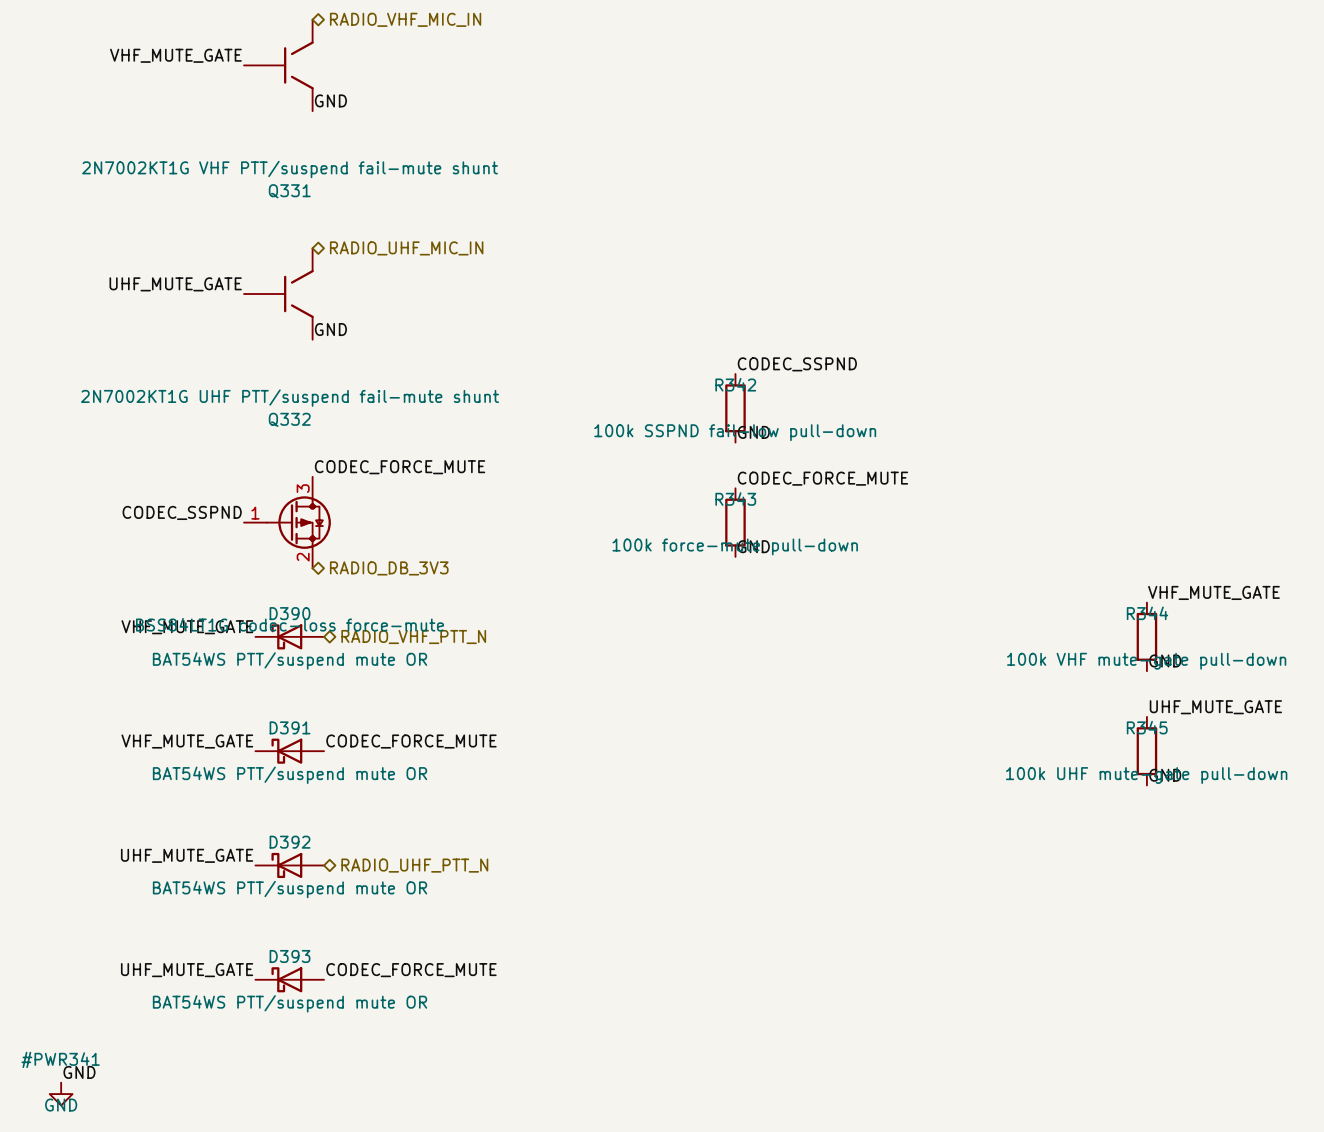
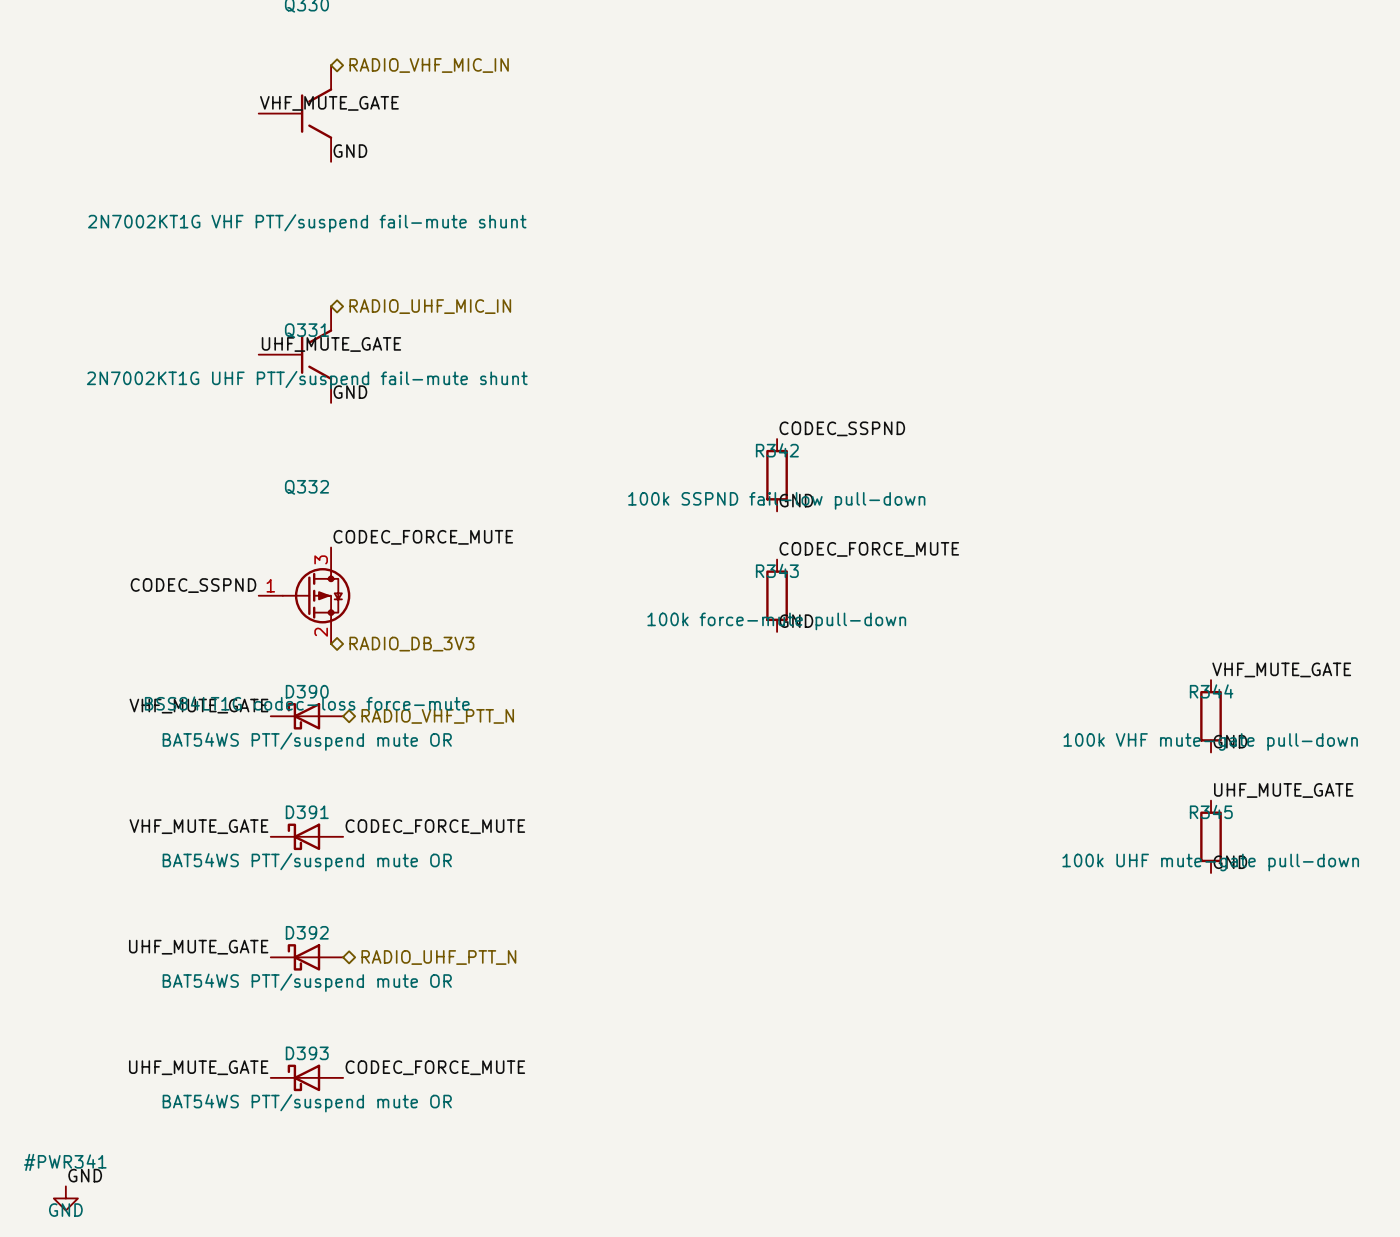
label position: VHF_MUTE_GATE (175, 55) -> VHF_MUTE_GATE (329, 103)
Q331 name position: Q331 (289, 191) -> Q331 (306, 330)
label position: UHF_MUTE_GATE (175, 284) -> UHF_MUTE_GATE (331, 344)
Q331 value position: 2N7002KT1G UHF PTT/suspend fail-mute shunt (290, 398) -> 2N7002KT1G UHF PTT/suspend fail-mute shunt (307, 380)

